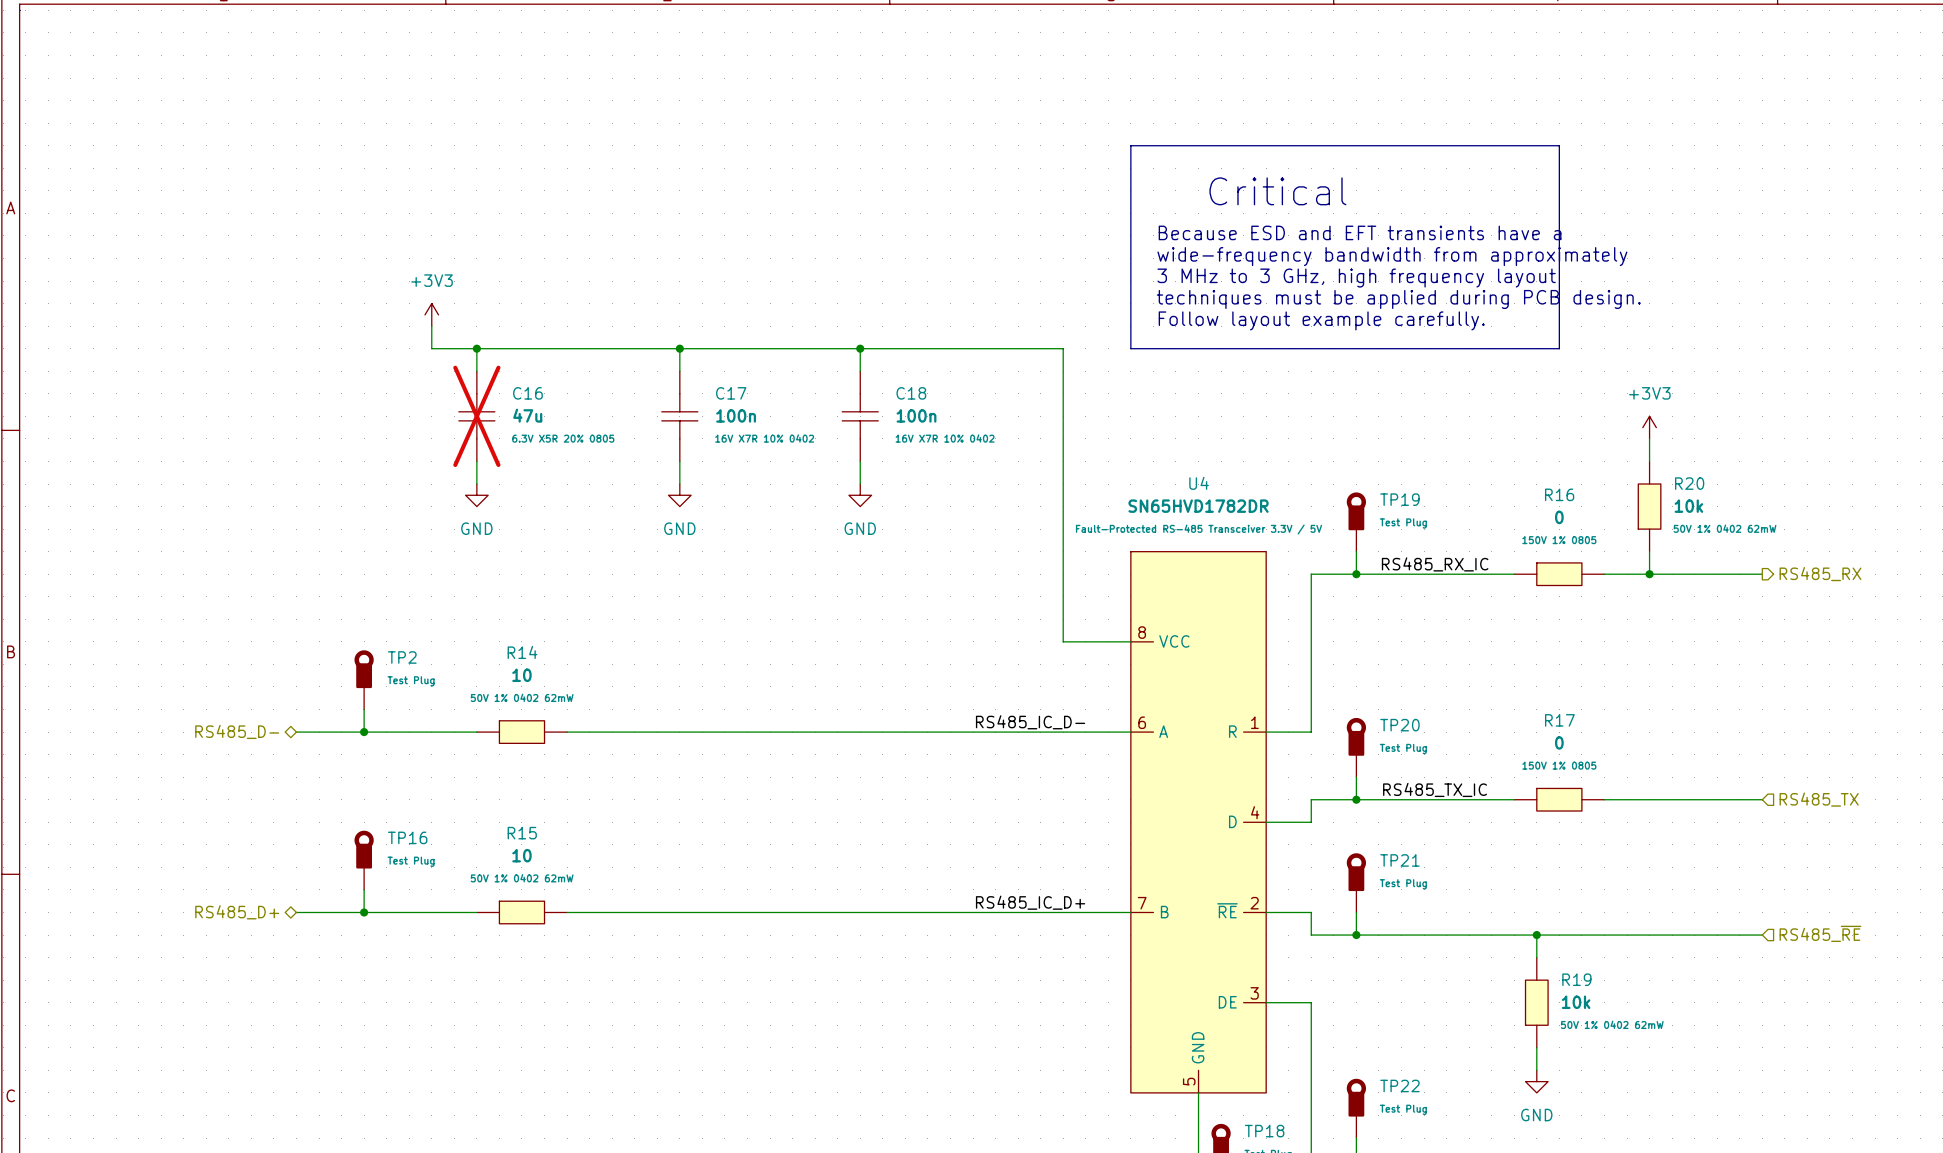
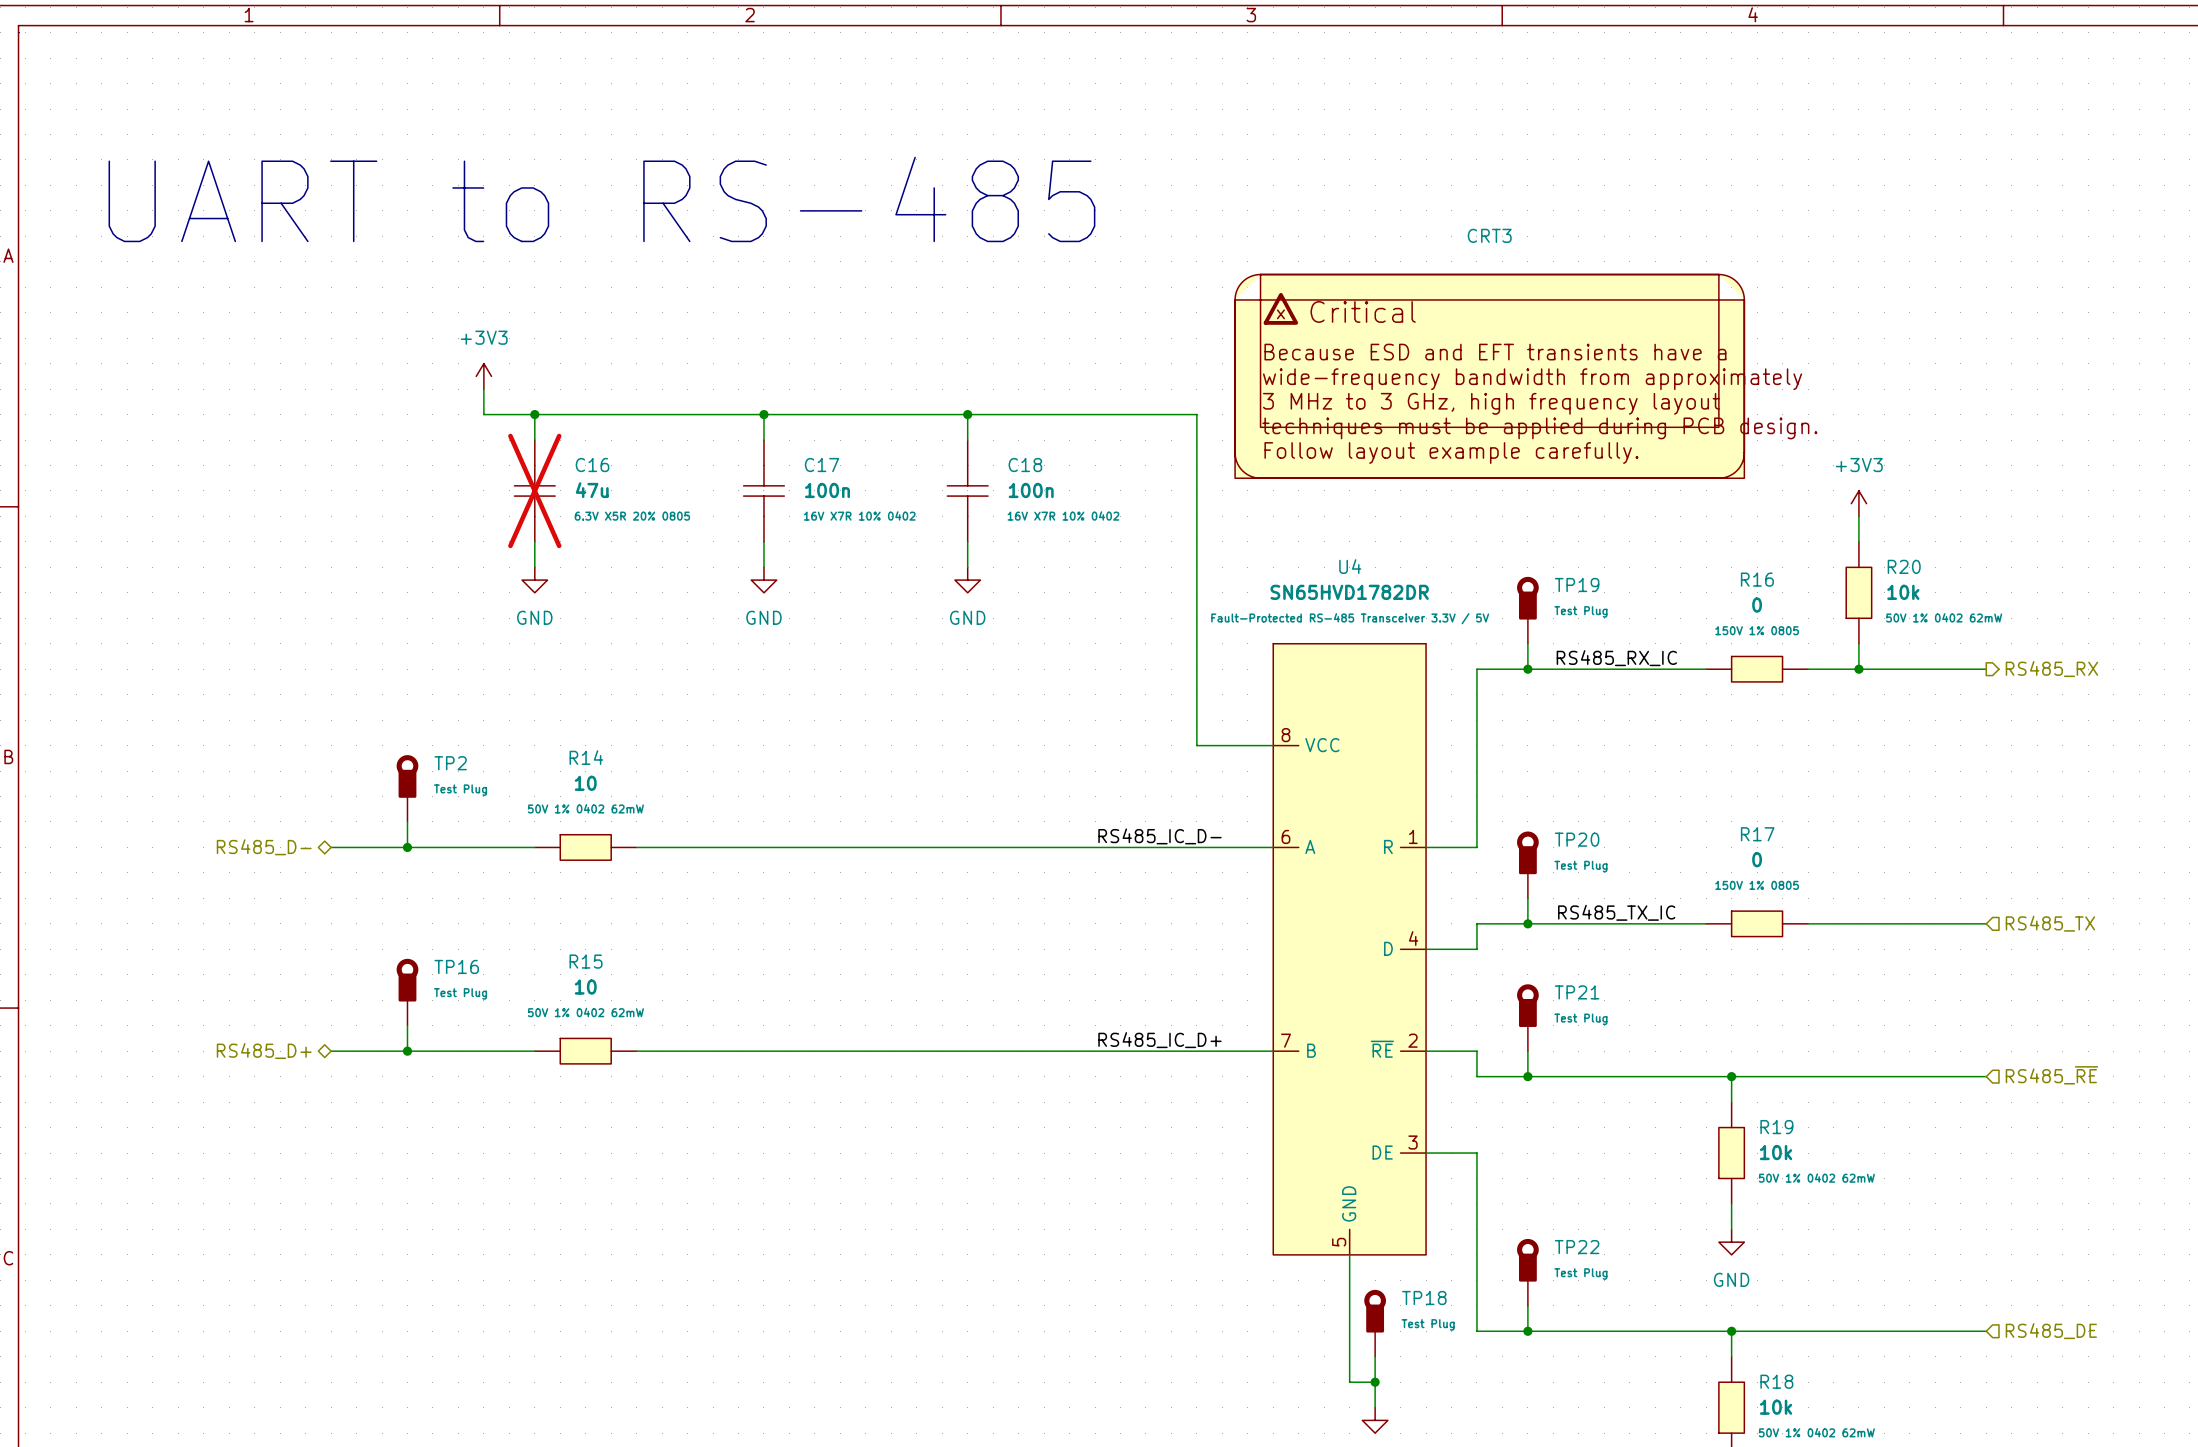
line: (1130, 145) (1559, 145) (1559, 348) (1130, 348) (1130, 145) -> none
text: none -> UART to RS-485 (601, 199)
text: Critical (1277, 191) -> none
text: Because ESD and EFT transients have a (1360, 232) -> none
text: wide-frequency bandwidth from approximately (1392, 256) -> none
text: 3 MHz to 3 GHz, high frequency layout (1356, 278) -> none
text: techniques must be applied during PCB design. (1398, 299) -> none
CRT3: none -> (1489, 376)
text: Follow layout example carefully. (1321, 320) -> none

